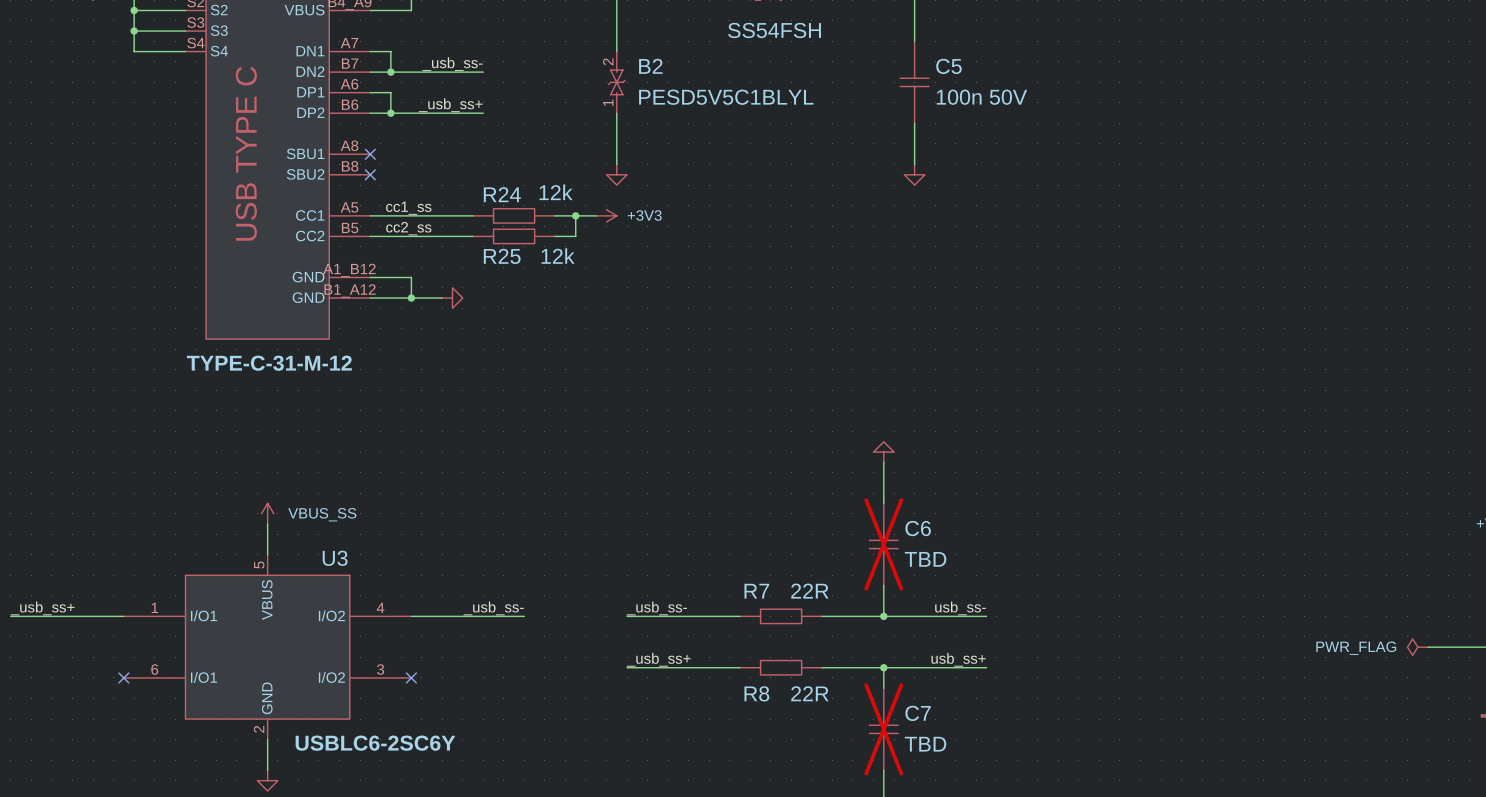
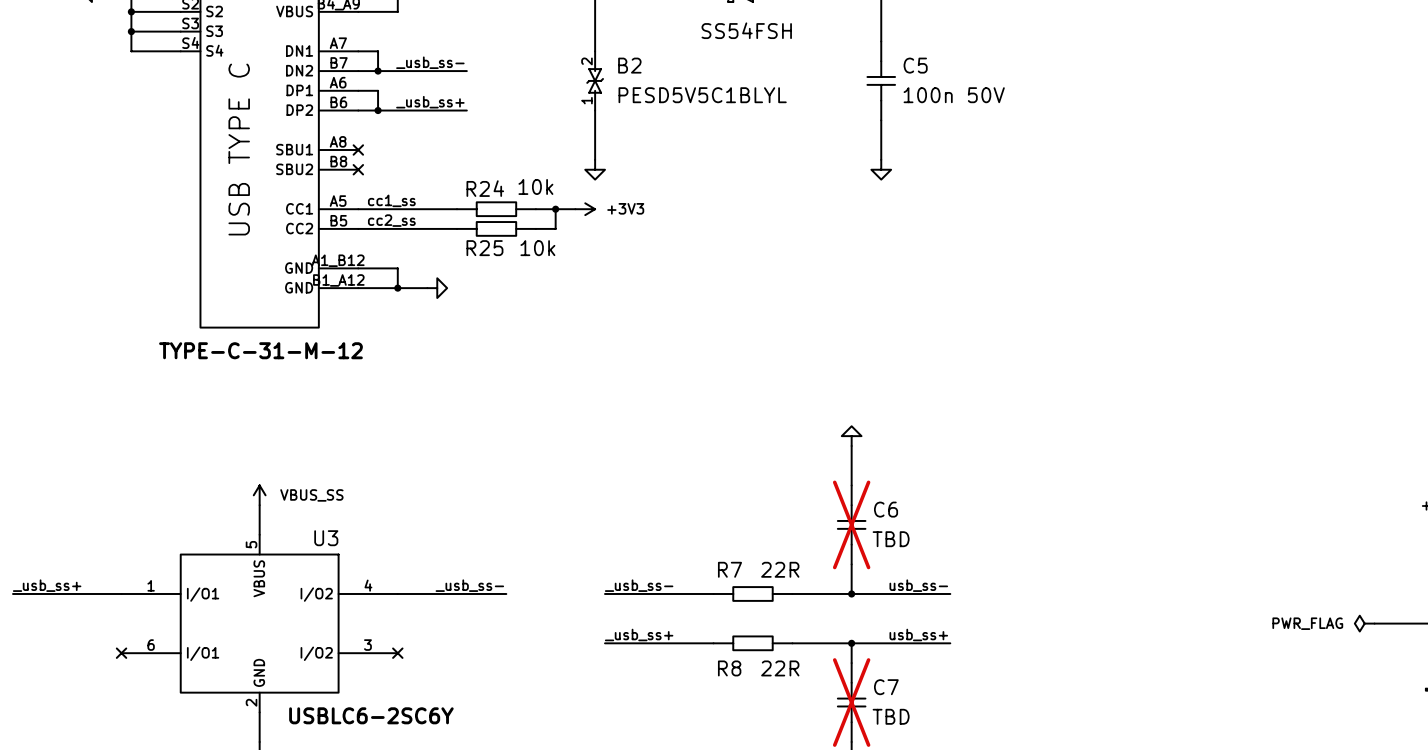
R24 value: 12k (556, 192) -> 10k (535, 186)
R25 value: 12k (558, 256) -> 10k (537, 248)

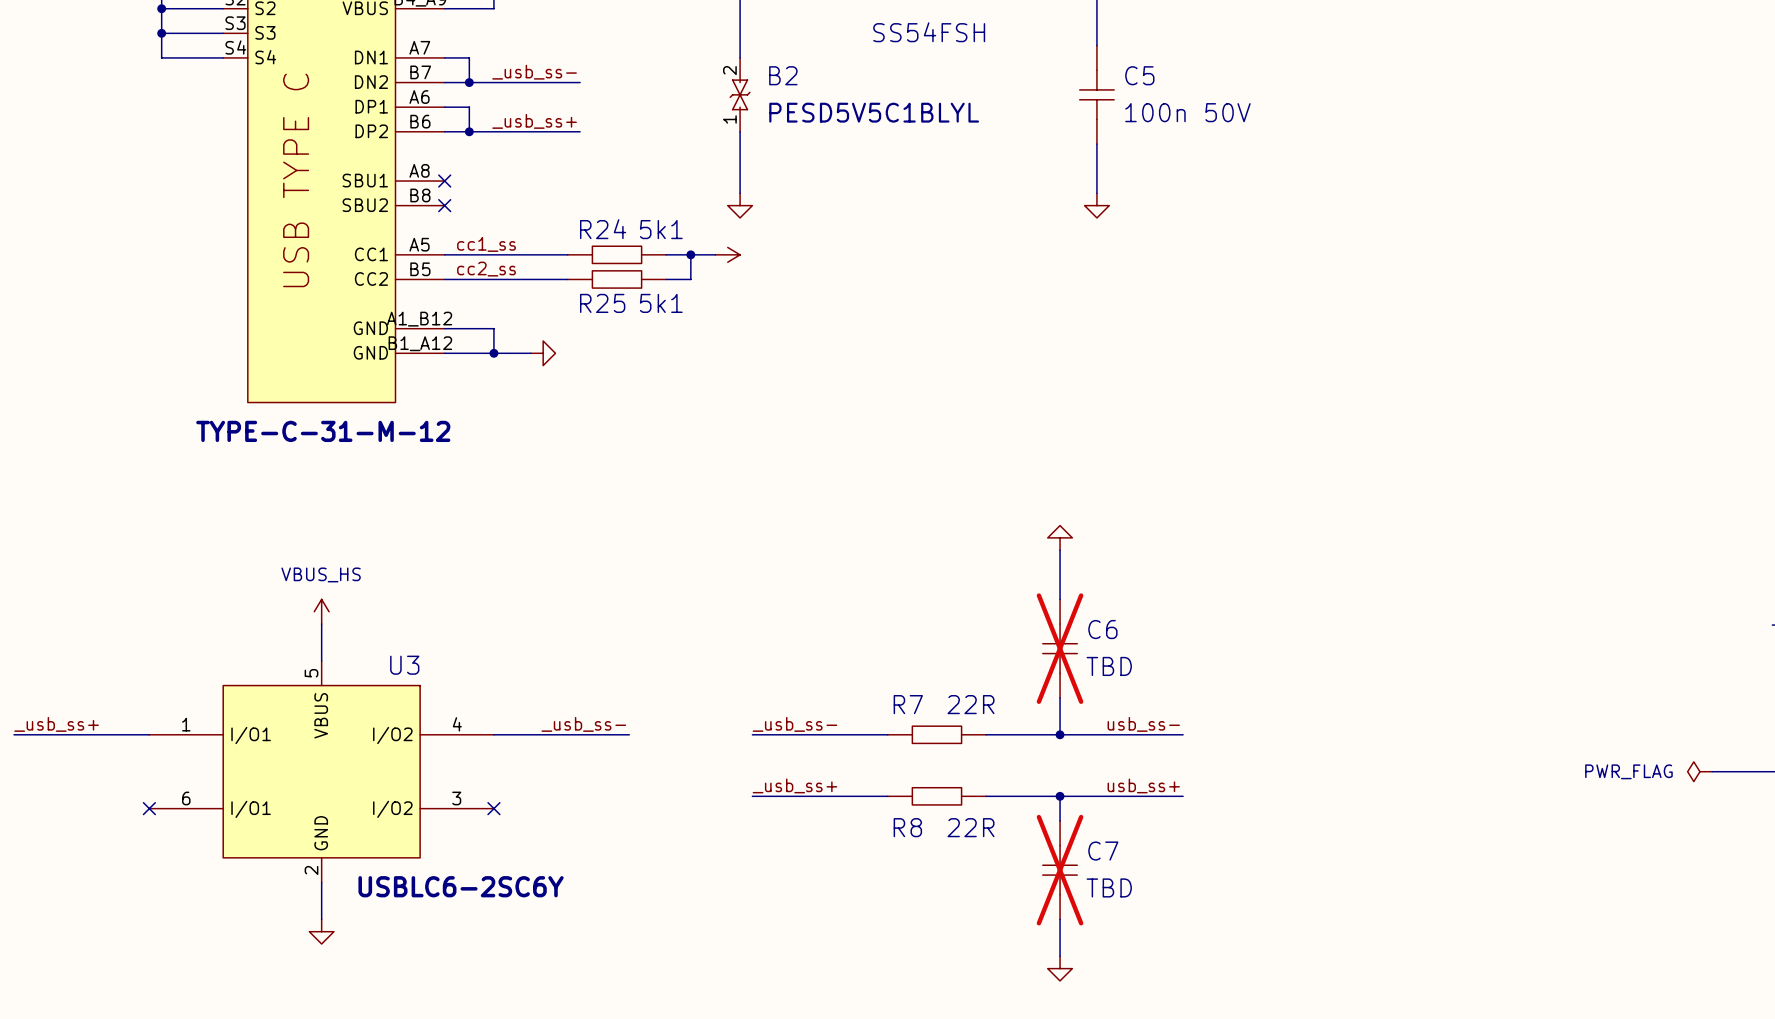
R24 value: 10k (535, 186) -> 5k1 (661, 229)
power symbol text: +3V3 (625, 208) -> none
R25 value: 10k (537, 248) -> 5k1 (661, 303)
power symbol: VBUS_SS (259, 495) -> VBUS_HS (321, 611)

